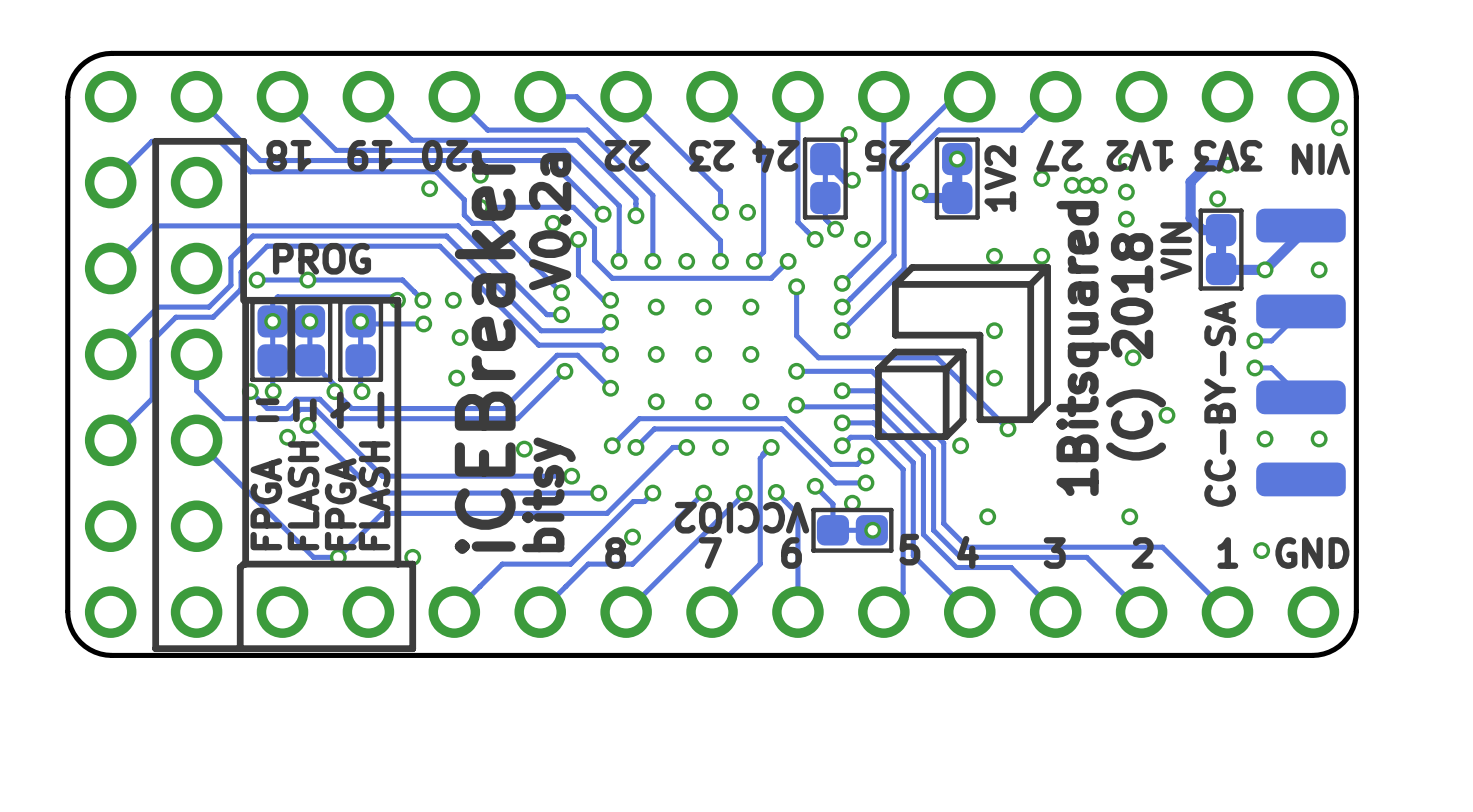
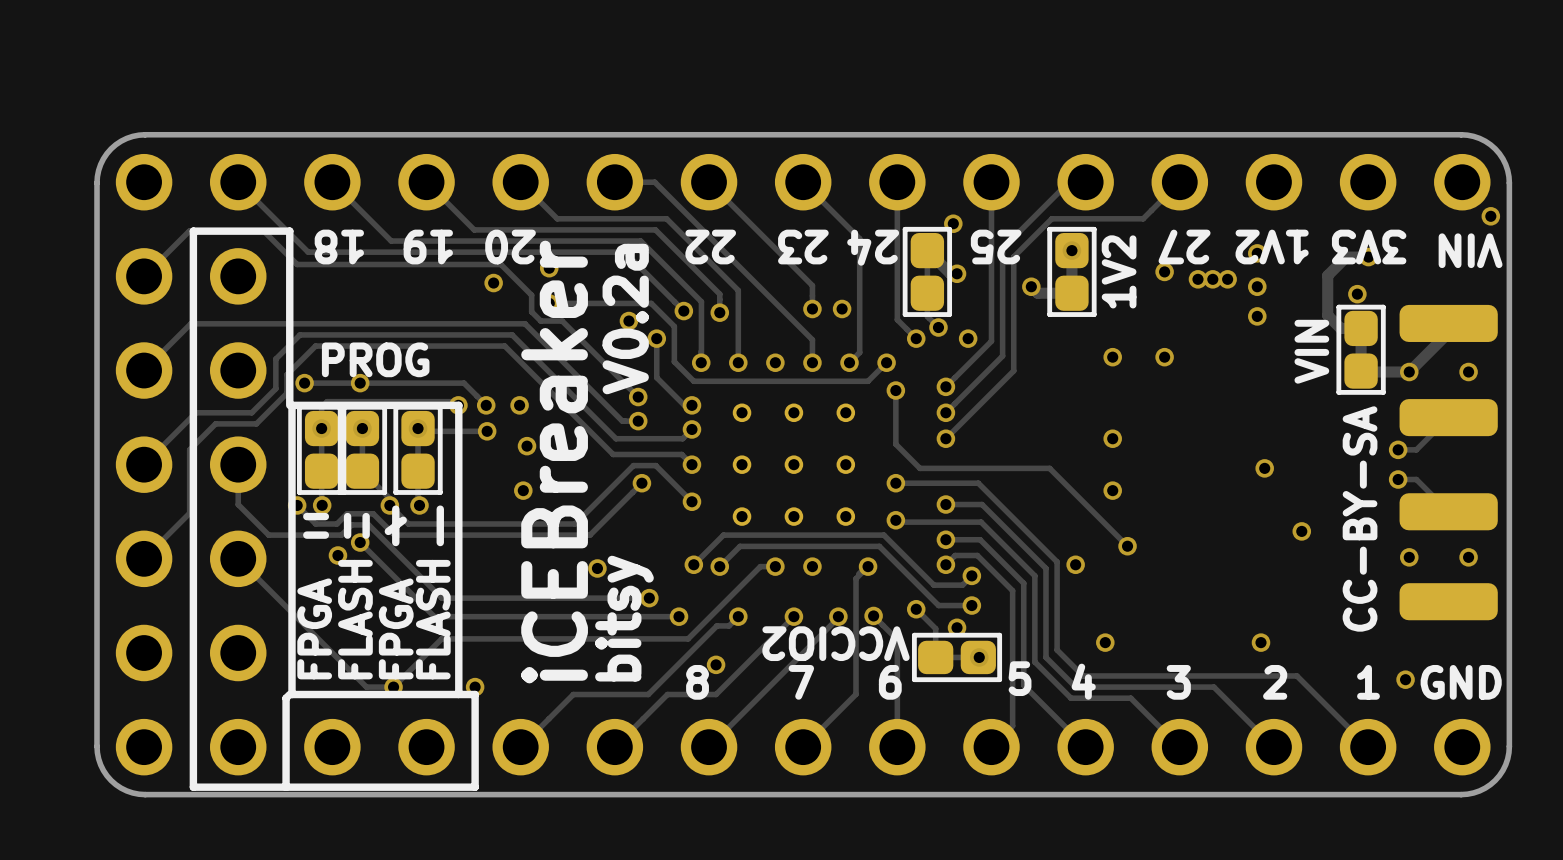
drawing: [875, 264, 1052, 440] -> none
text: (C) 2018 (1136, 346) -> none
text: 1Bitsquared (1083, 348) -> none

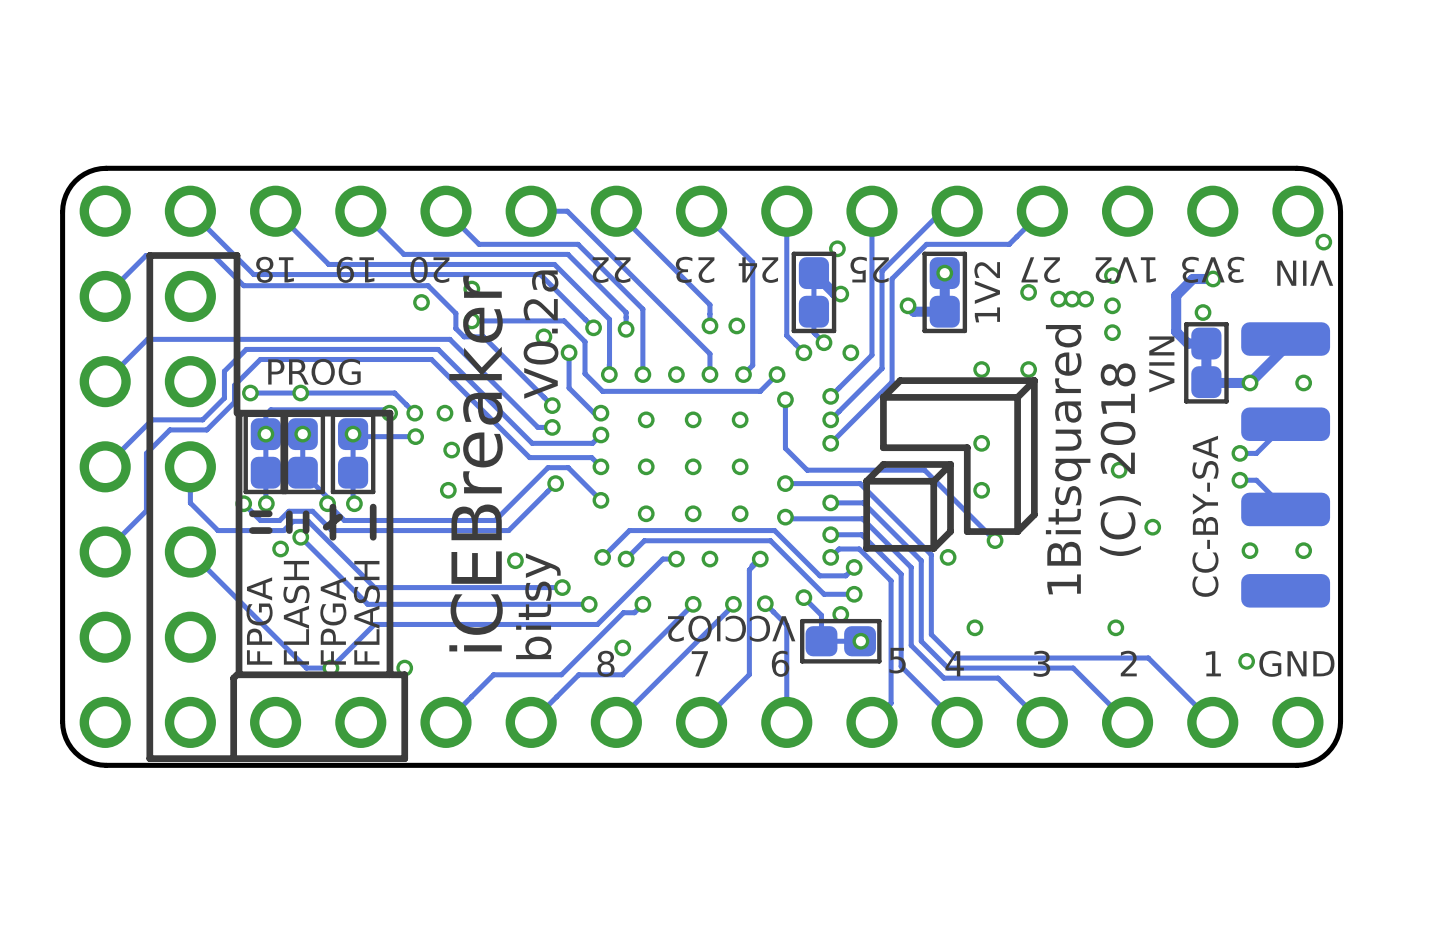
drawing: none -> [863, 377, 1038, 552]
text: none -> (C) 2018 (1120, 459)
text: none -> 1Bitsquared (1068, 459)

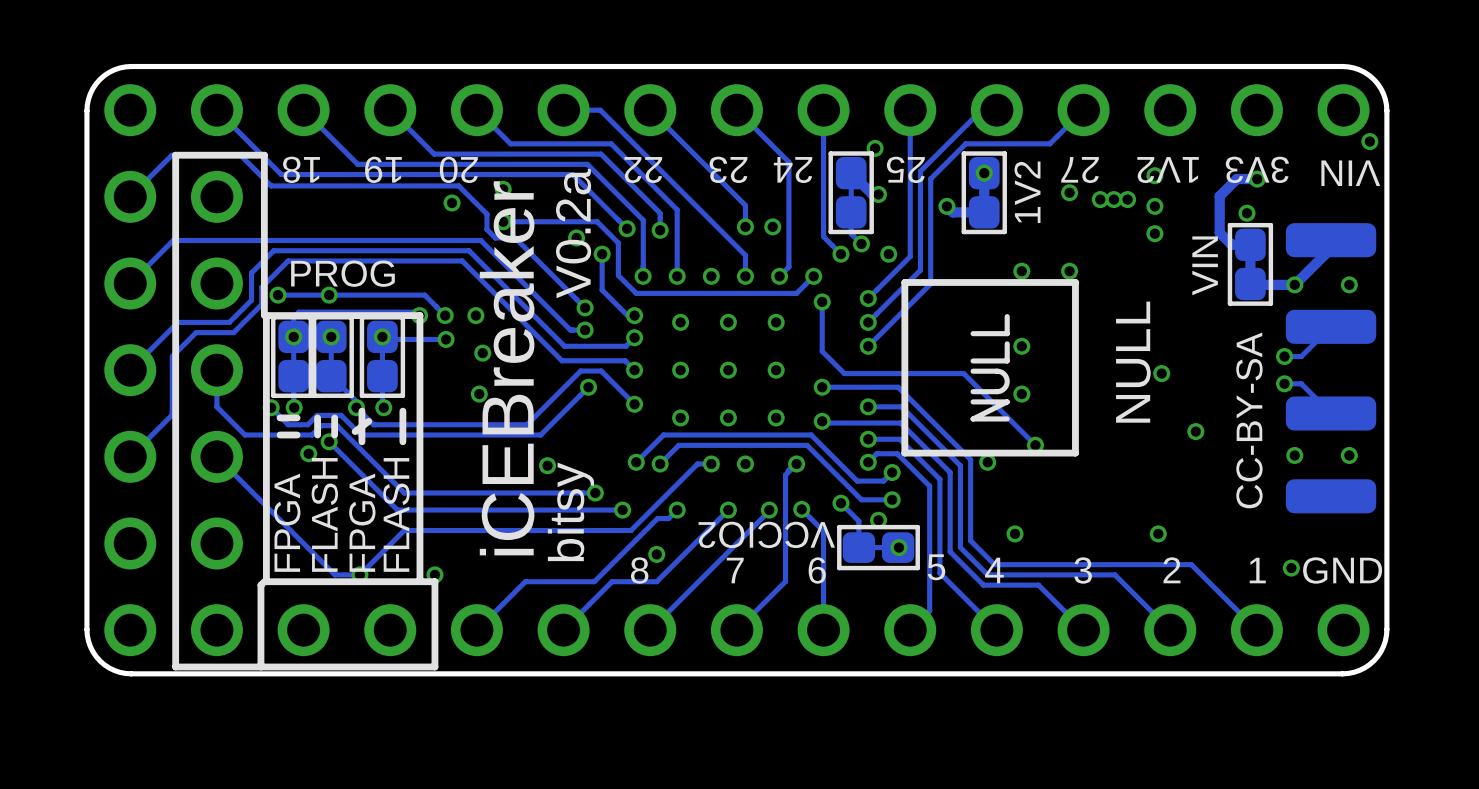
drawing shape: [863, 377, 1038, 552] -> [901, 279, 1079, 457]
text: none -> NULL (1133, 362)
text: 1Bitsquared (1068, 459) -> none
text: (C) 2018 (1120, 459) -> none

